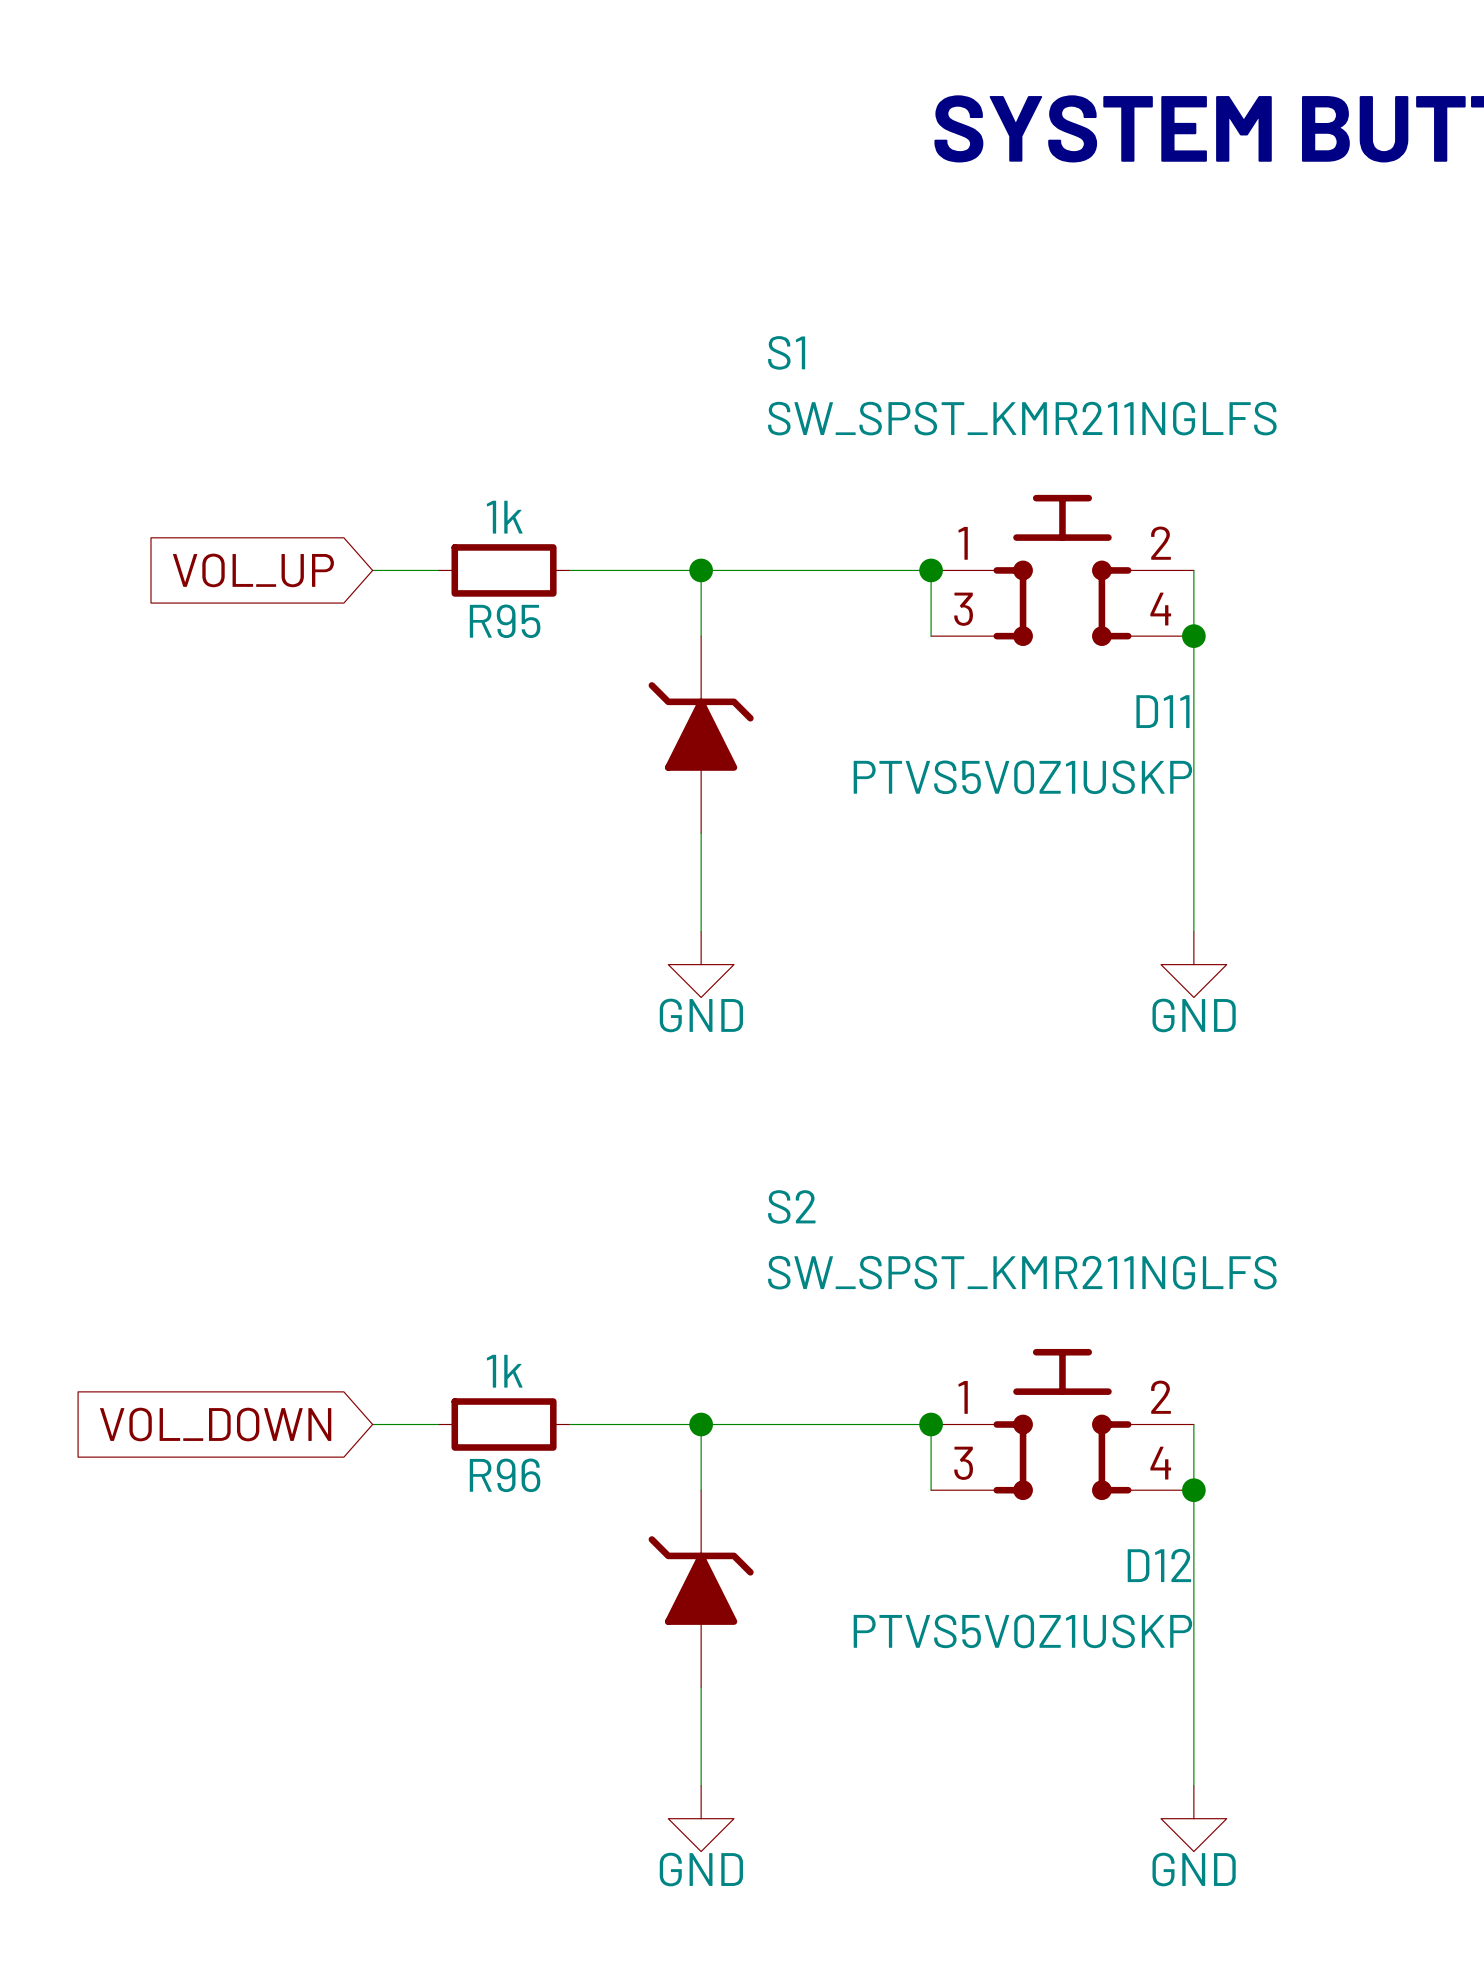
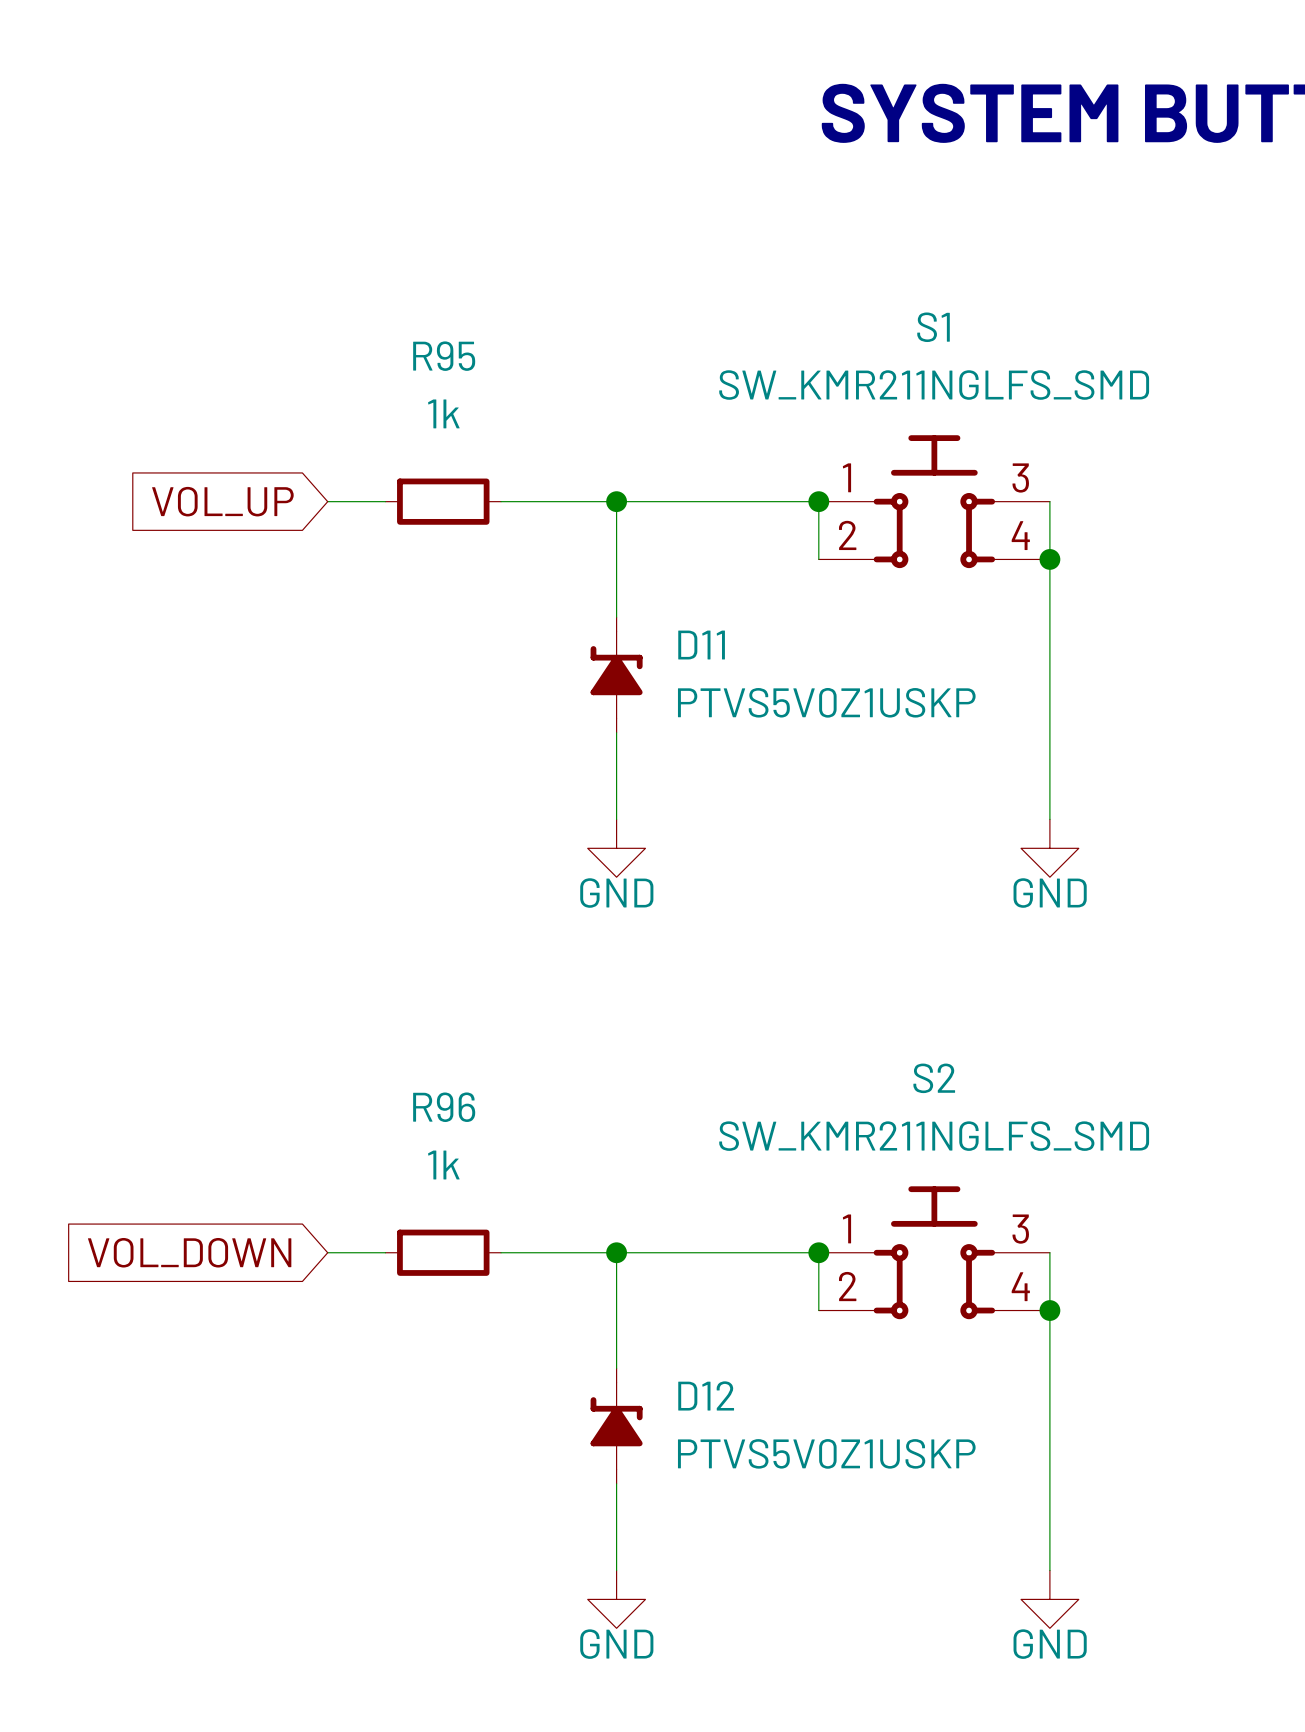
S1 name position: S1 (786, 352) -> S1 (933, 327)
S1 value: SW_SPST_KMR211NGLFS (1022, 418) -> SW_KMR211NGLFS_SMD (934, 385)
S1 symbol: [931, 494, 1194, 646] -> [818, 435, 1050, 569]
R95 text position: 1k (504, 517) -> 1k (443, 413)
R95 name position: R95 (505, 621) -> R95 (444, 356)
D11 symbol: [648, 636, 754, 834] -> [590, 617, 643, 733]
D11 name position: D11 (1162, 711) -> D11 (701, 645)
S2 name position: S2 (791, 1206) -> S2 (934, 1078)
S2 value: SW_SPST_KMR211NGLFS (1022, 1272) -> SW_KMR211NGLFS_SMD (934, 1136)
S2 symbol: [931, 1348, 1194, 1501] -> [818, 1186, 1050, 1320]
R96 text position: 1k (504, 1371) -> 1k (443, 1165)
R96 name position: R96 (505, 1475) -> R96 (444, 1107)
D12 symbol: [648, 1490, 754, 1688] -> [590, 1368, 643, 1484]
D12 name position: D12 (1159, 1565) -> D12 (706, 1395)

